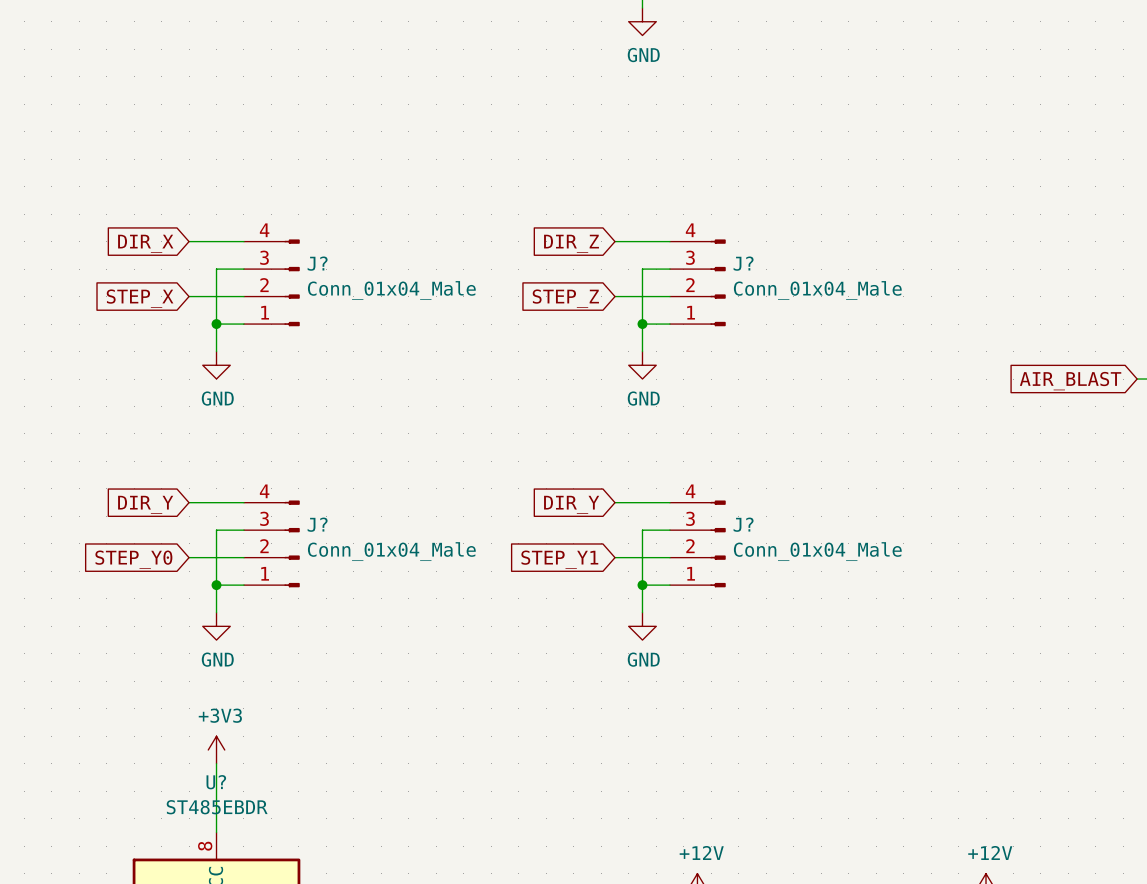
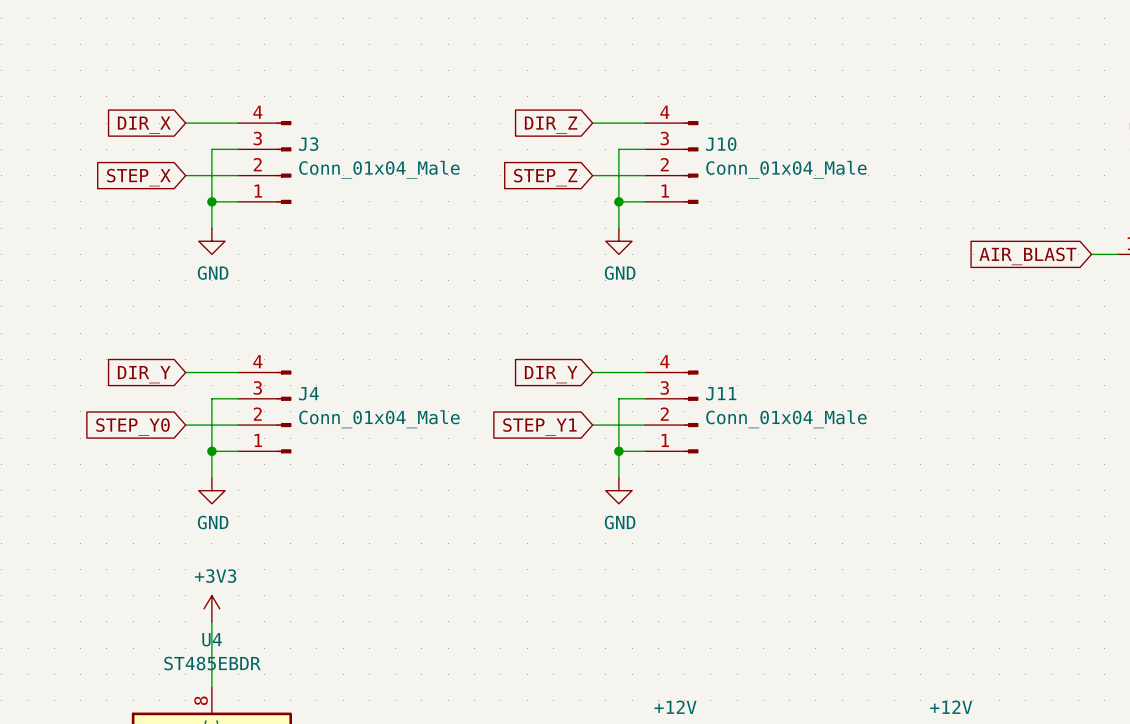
J? name: J? (317, 263) -> J3 (308, 144)
J? name: J? (743, 263) -> J10 (721, 144)
J? name: J? (317, 524) -> J4 (308, 393)
J? name: J? (743, 524) -> J11 (721, 393)
U? name: U? (216, 782) -> U4 (212, 639)

